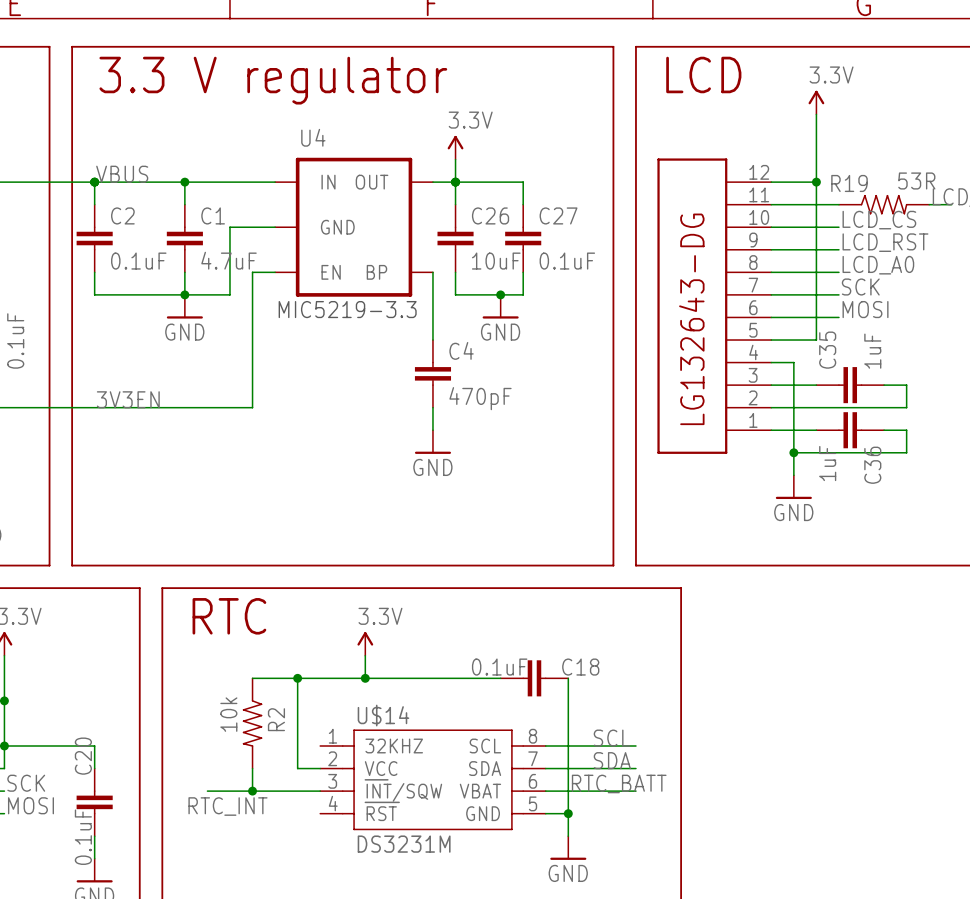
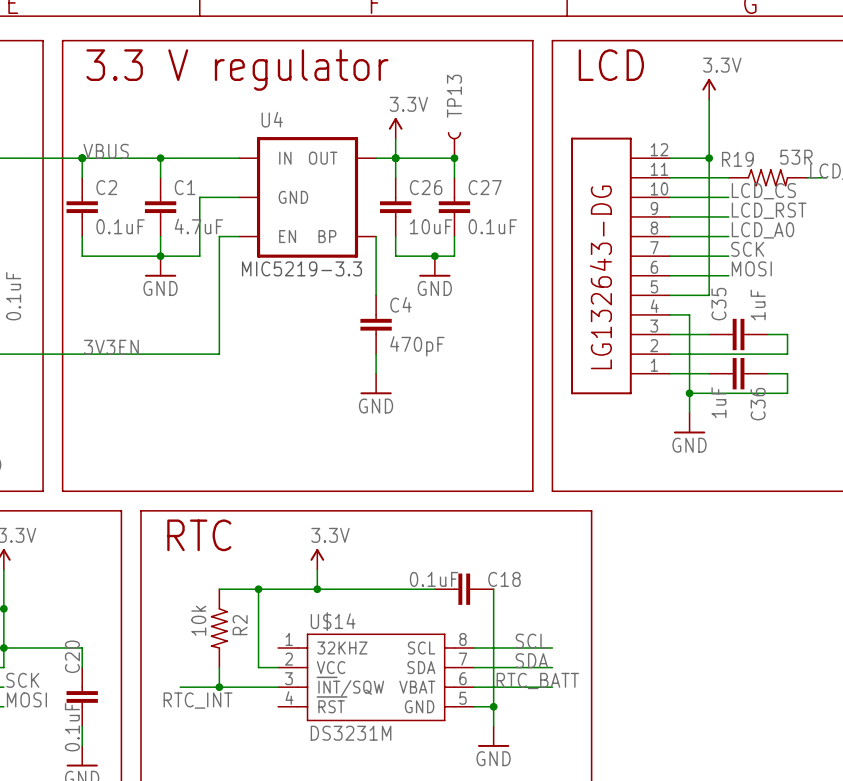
TP13: none -> (454, 145)
junction: none -> (454, 158)

